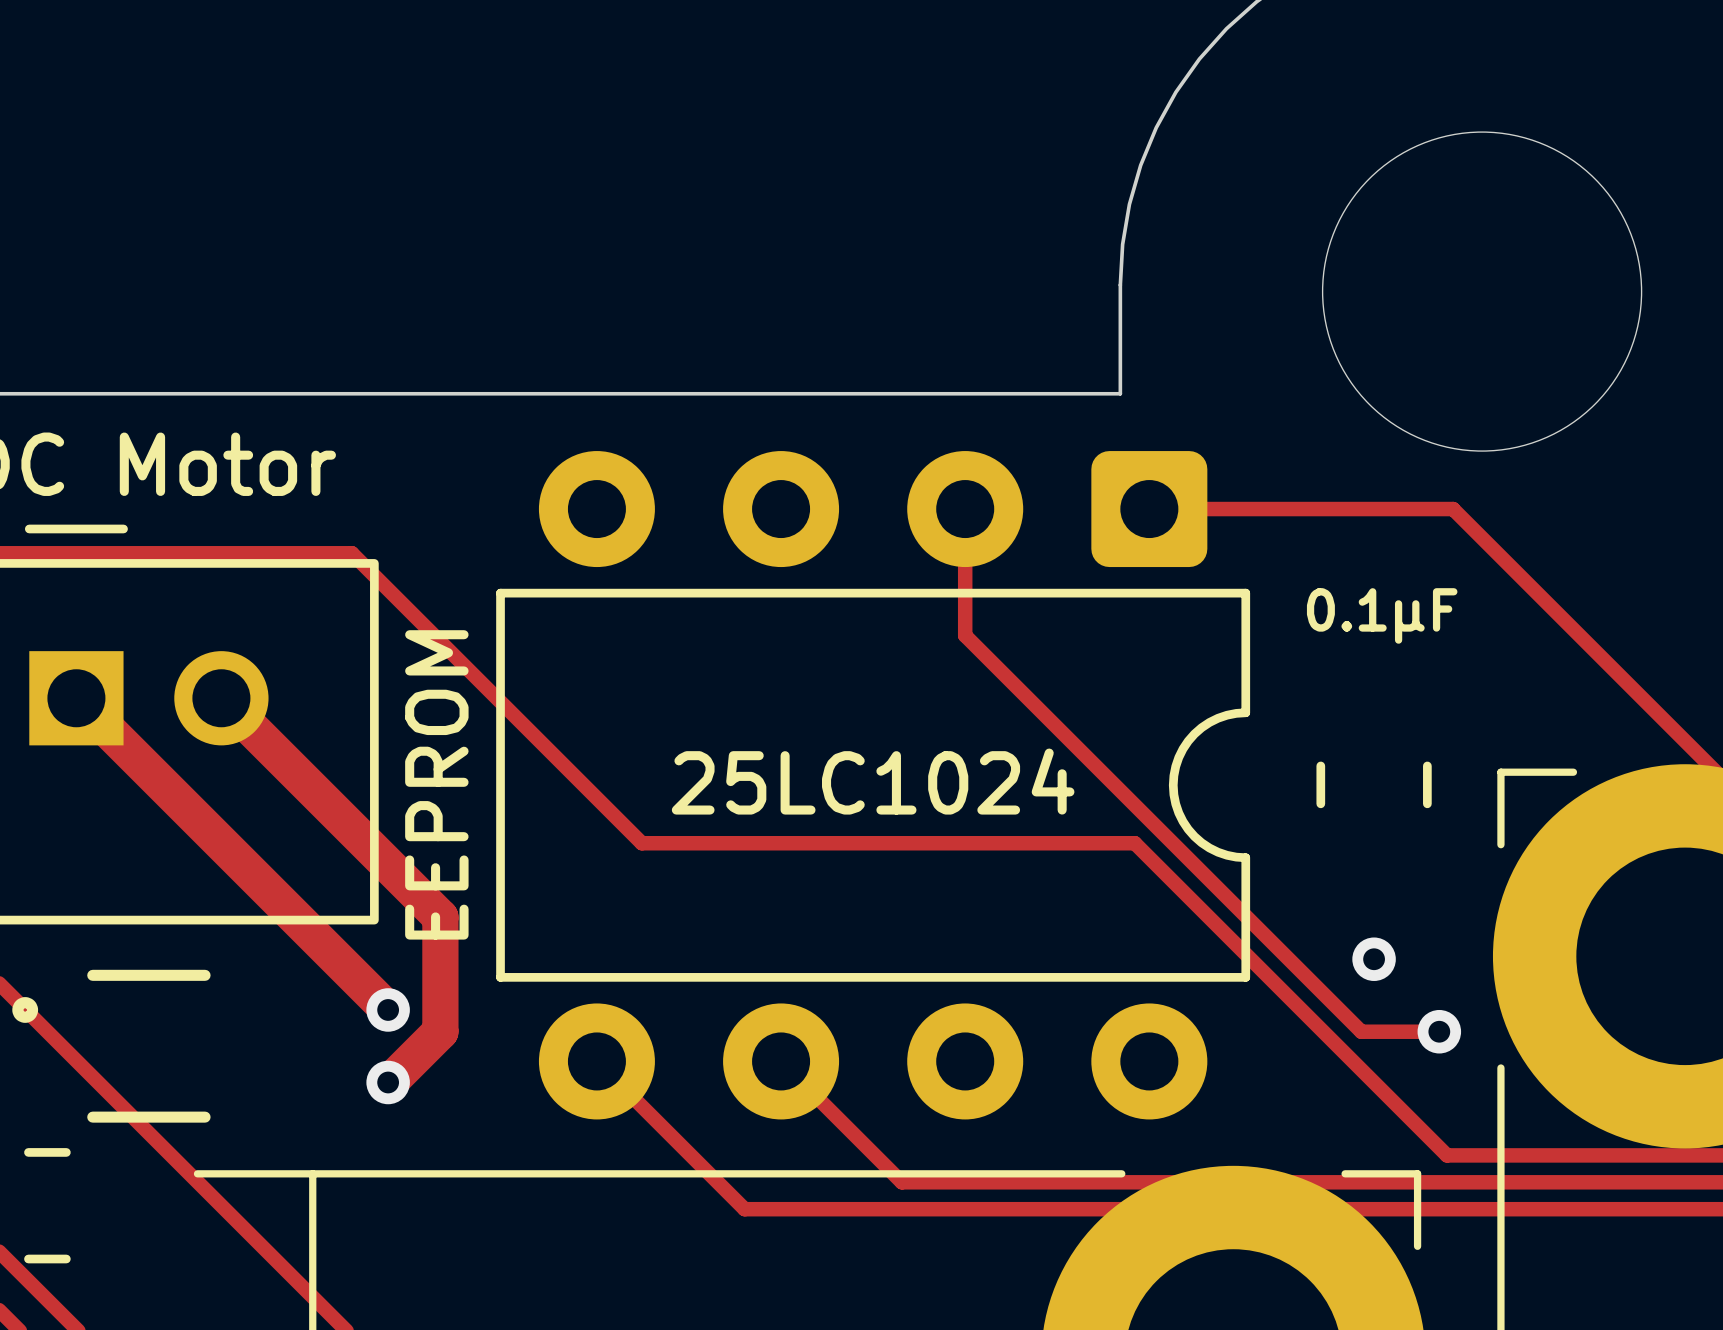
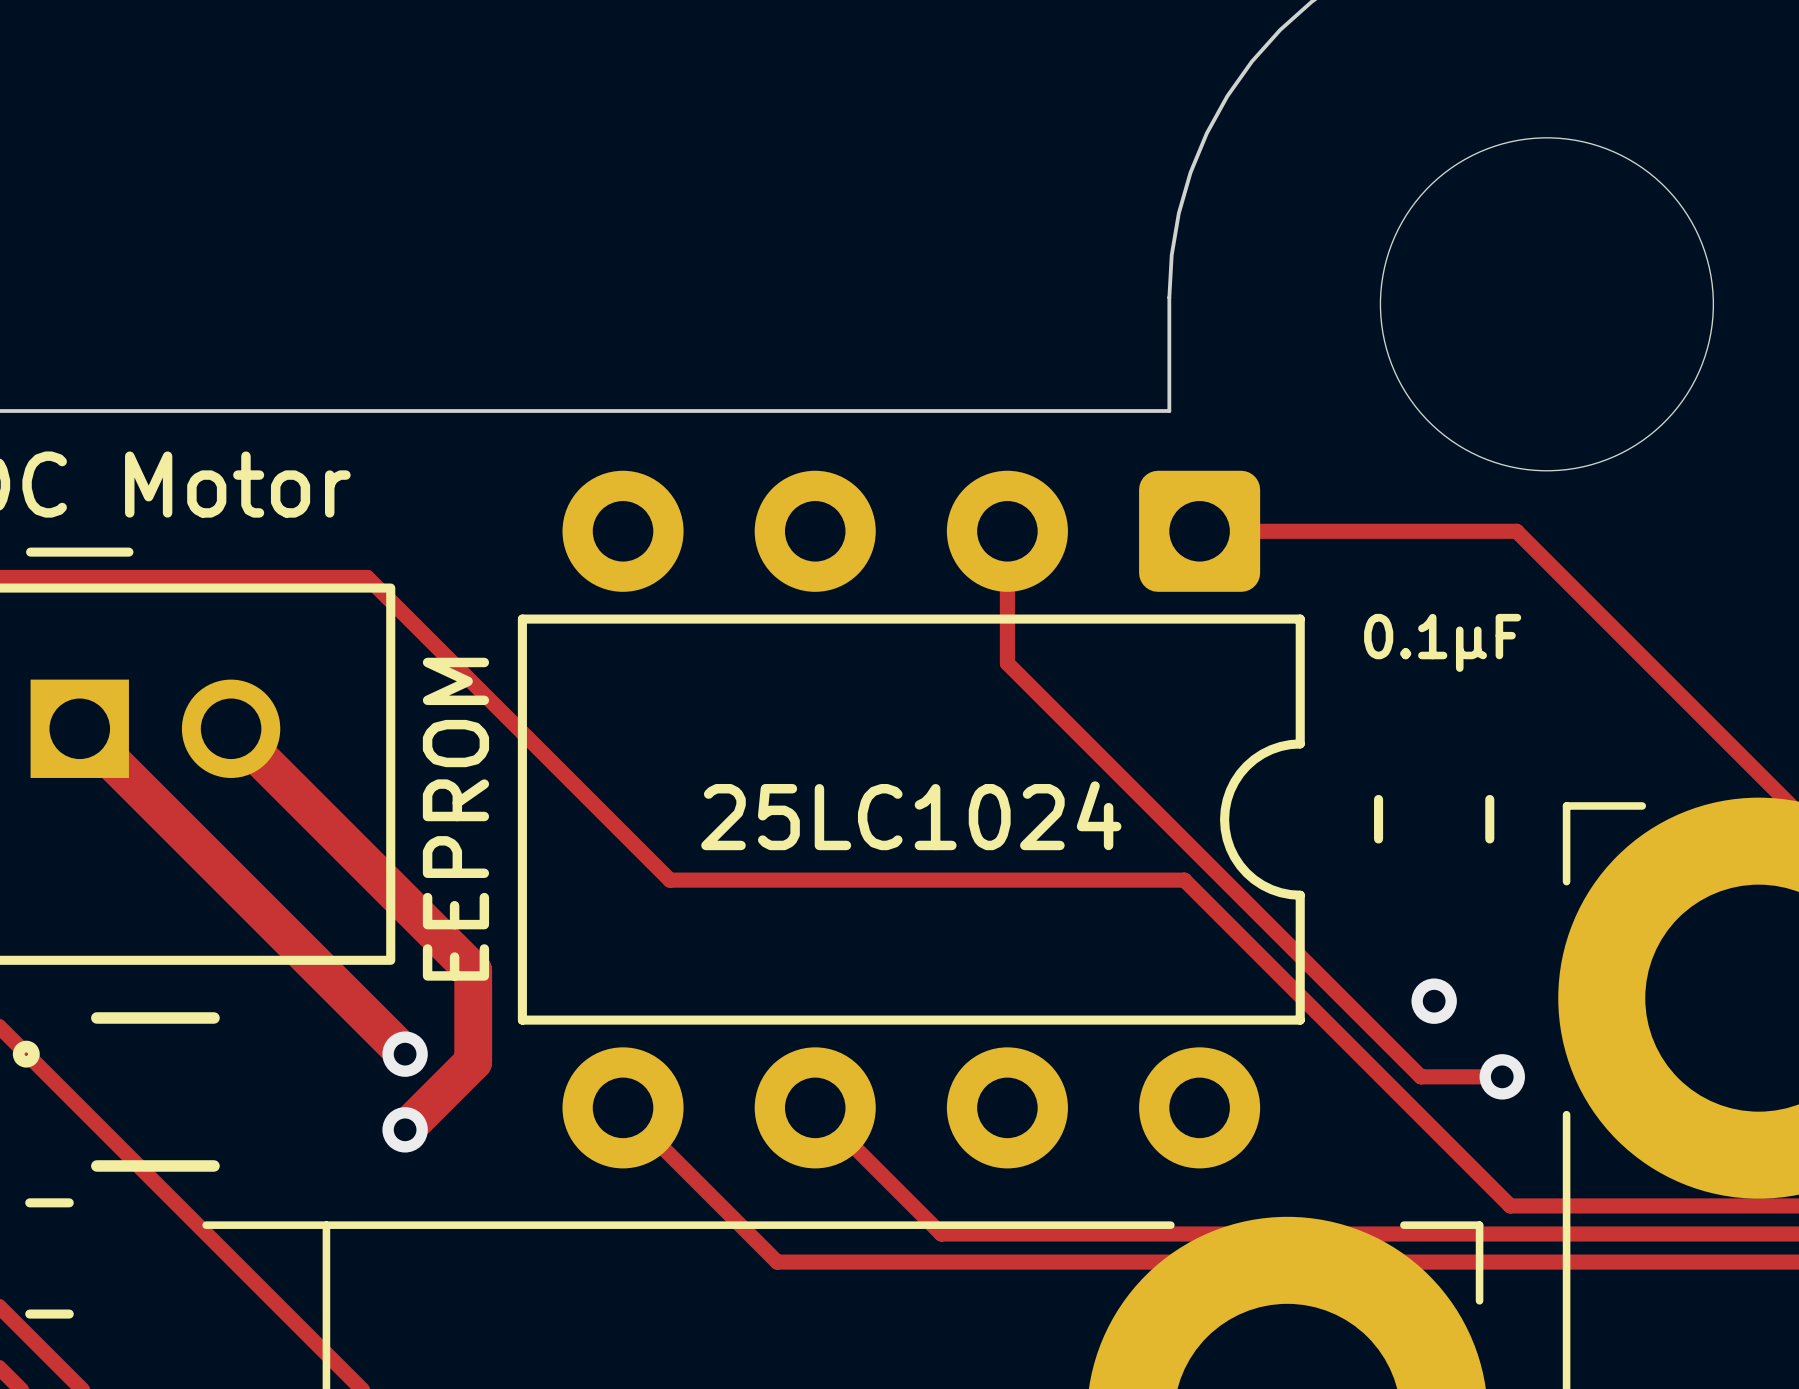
track: (440, 917) (440, 1031) (389, 1082) -> (459, 957) (473, 970) (473, 1061) (405, 1129)

